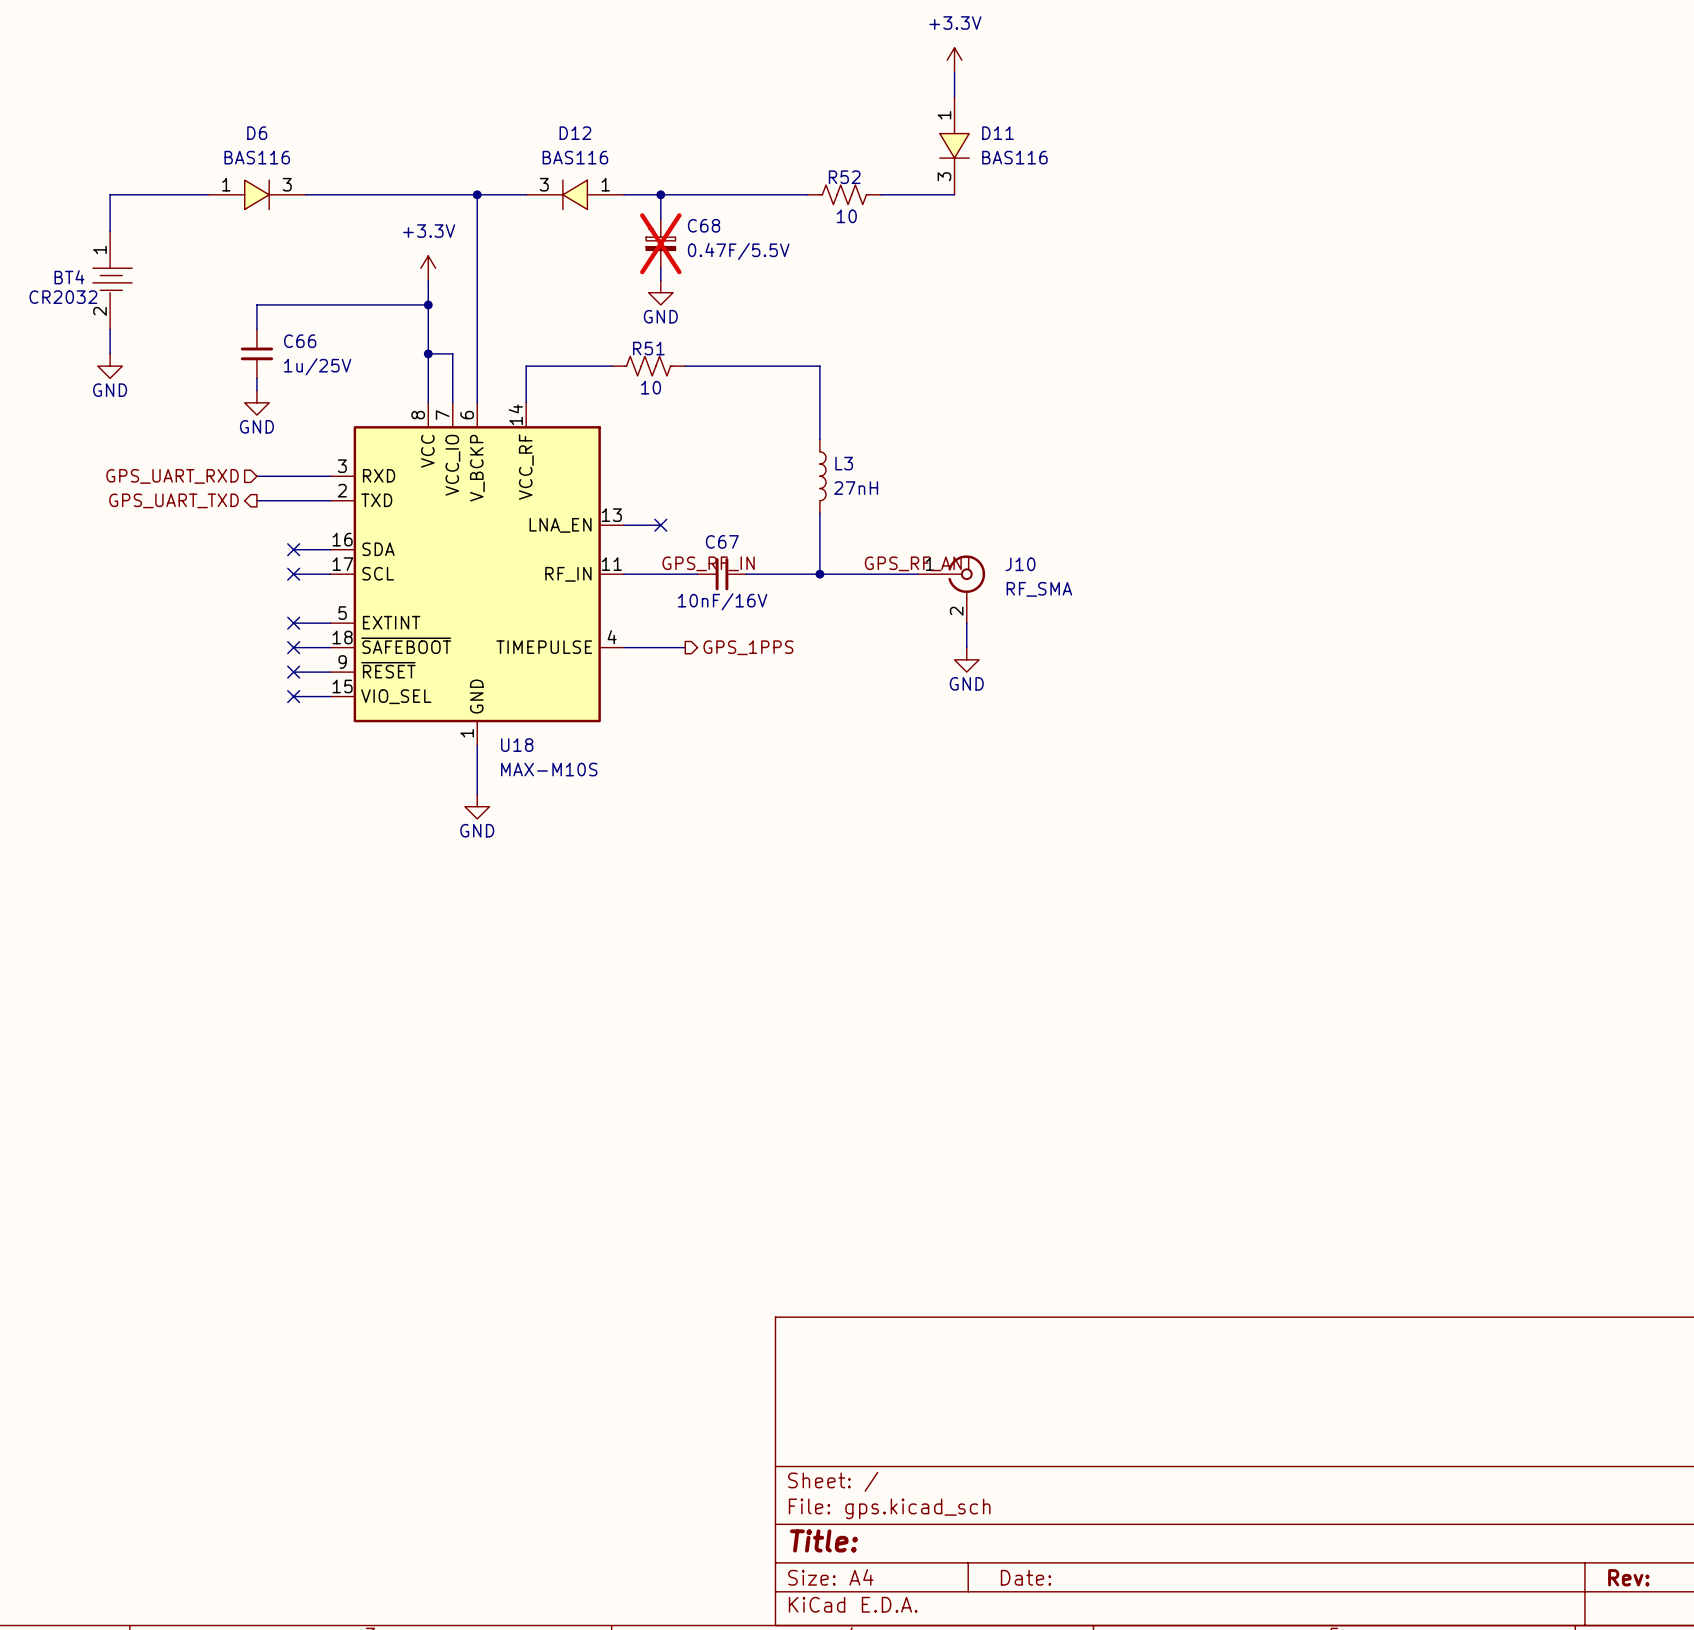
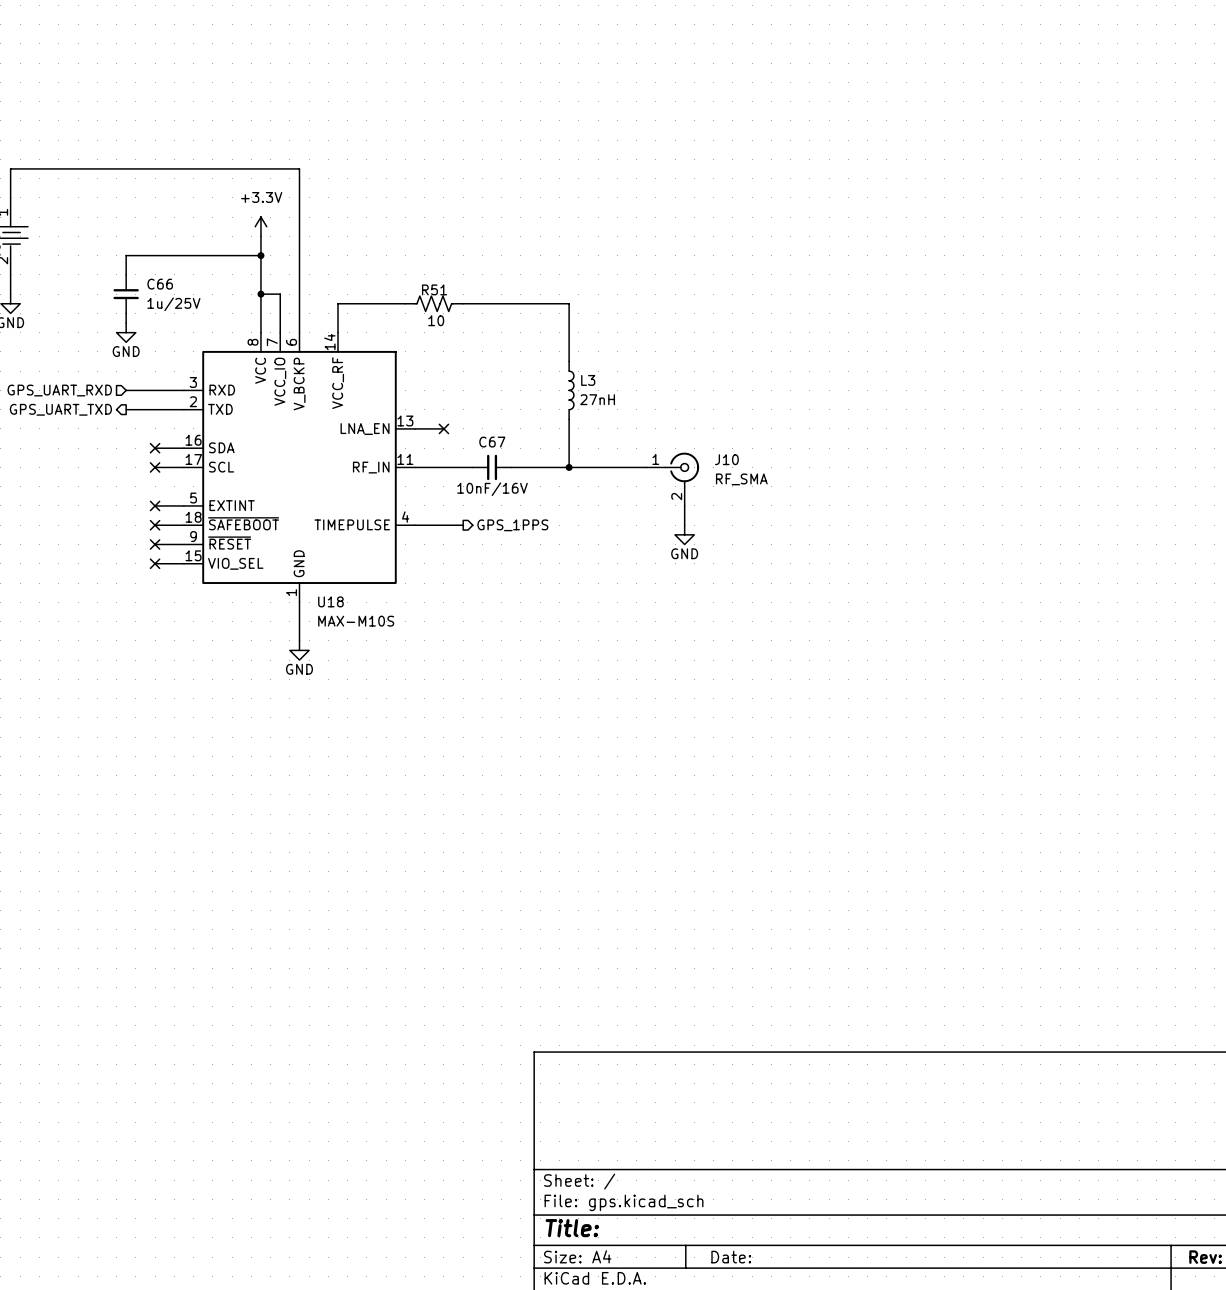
power symbol: +3.3V (954, 60) -> none
wire: (954, 72) (954, 96) -> none
D11: BAS116 (954, 145) -> none
D6: BAS116 (256, 194) -> none
wire: (477, 194) (526, 194) -> none
junction: (477, 194) -> none
D12: BAS116 (575, 194) -> none
wire: (624, 194) (807, 194) -> none
wire: (660, 194) (660, 219) -> none
junction: (660, 194) -> none
R52: 10 (844, 194) -> none
wire: (881, 194) (954, 194) -> none
C68: 0.47F/5.5V (660, 243) -> none
wire: (660, 268) (660, 280) -> none
power symbol: GND (660, 292) -> none
label: GPS_RF_IN (708, 563) -> none
label: GPS_RF_ANT (918, 563) -> none

